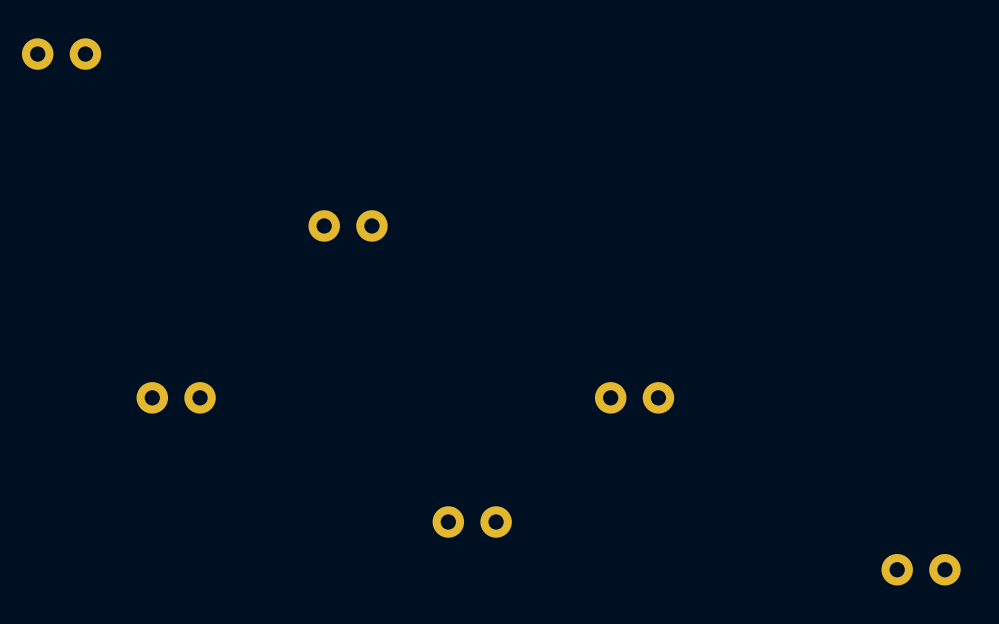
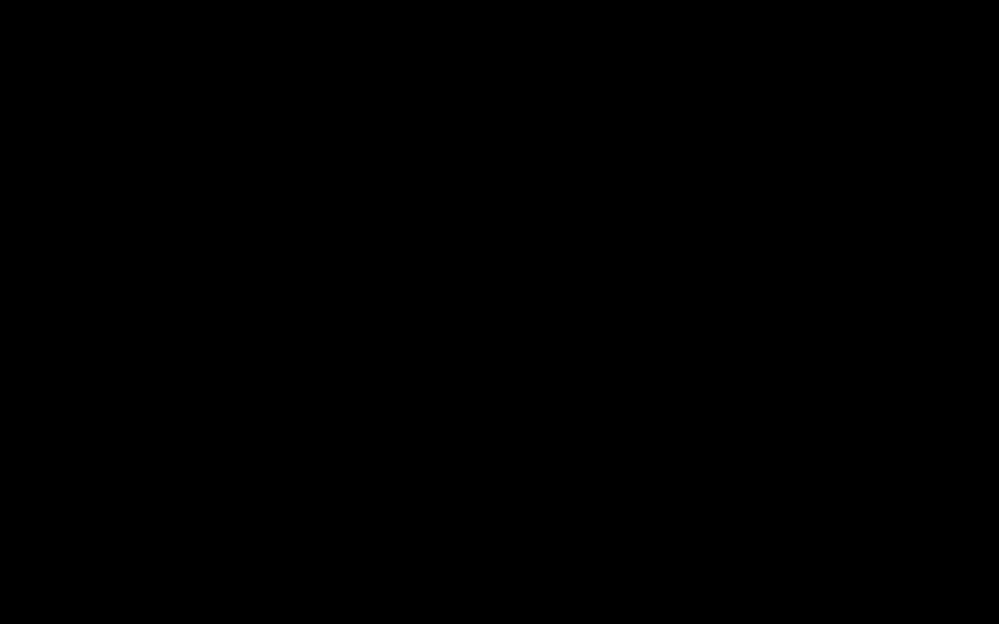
part: (61, 54) -> none
part: (348, 225) -> none
part: (176, 397) -> none
part: (634, 397) -> none
part: (472, 521) -> none
part: (921, 569) -> none

